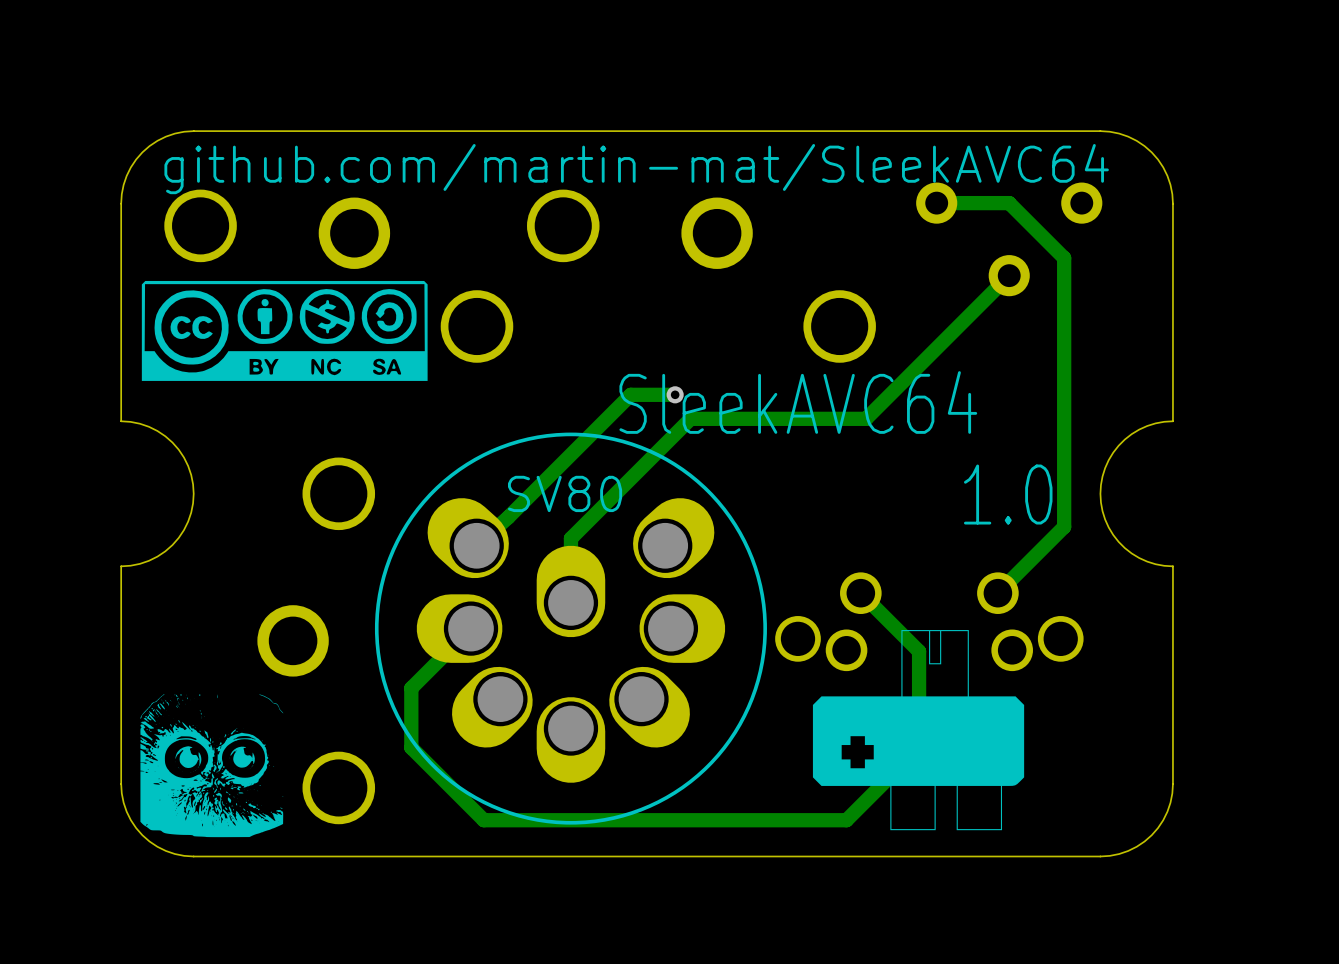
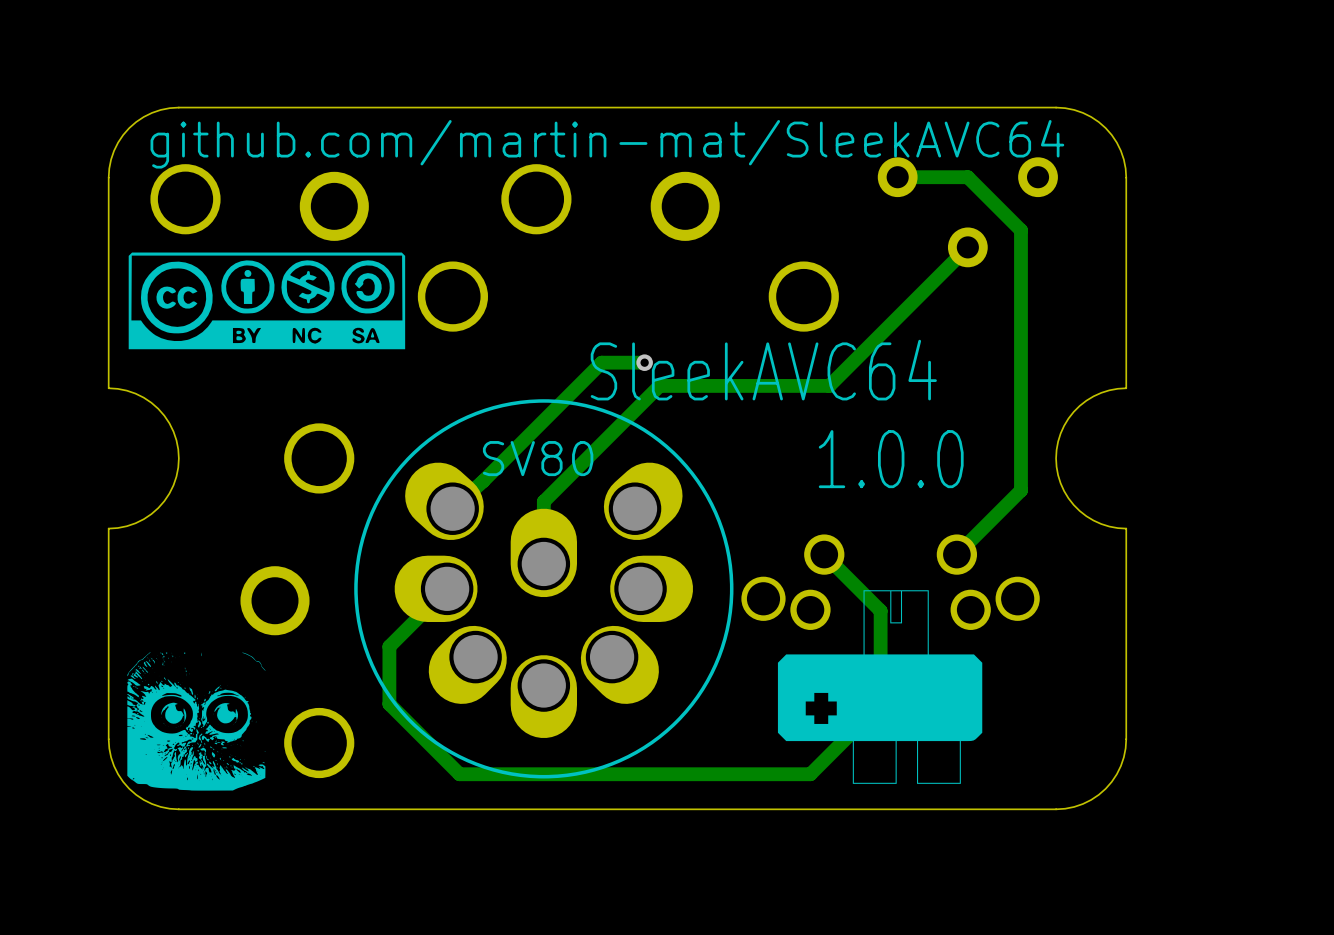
text: 1.0 (1008, 494) -> 1.0.0 (891, 459)

